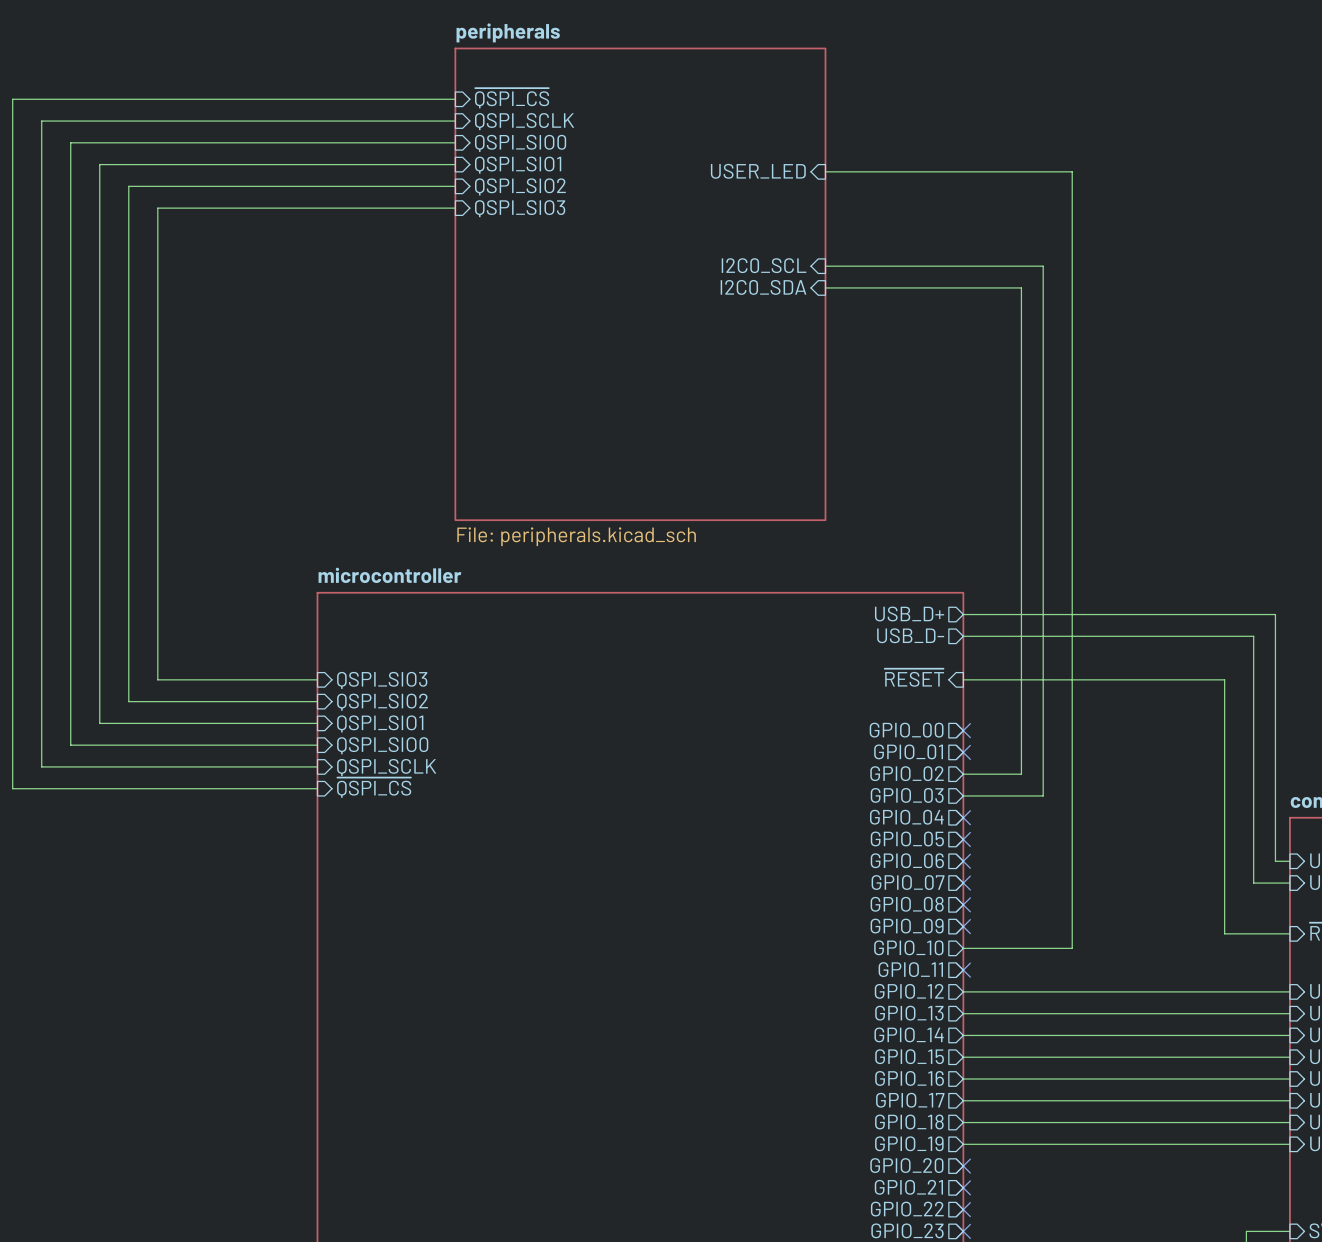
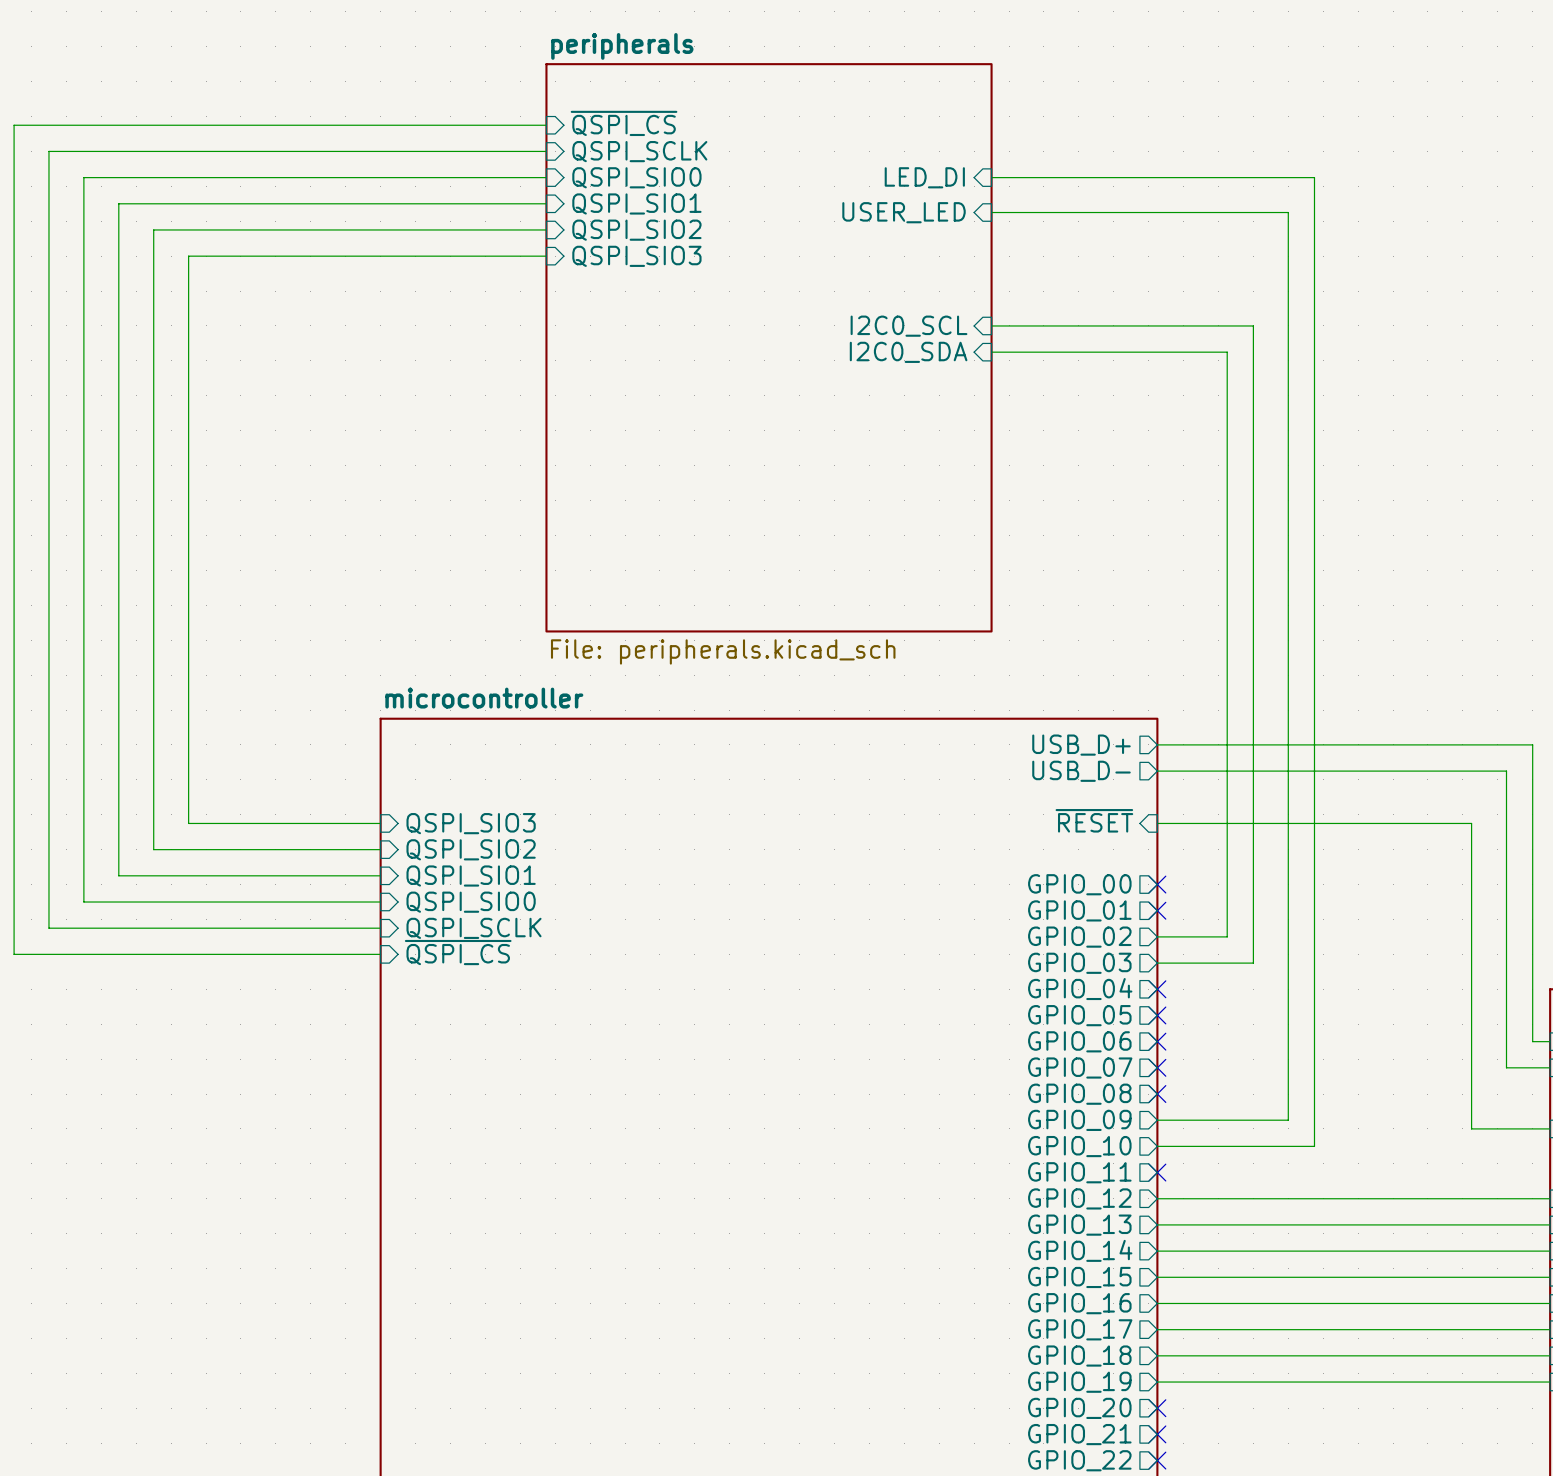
sheet pin: none -> LED_DI (924, 177)
wire: none -> (991, 177) (1314, 177) (1314, 1146) (1288, 1146)
no-connect mark: (963, 926) -> none
wire: (1072, 926) (1072, 948) -> (1288, 1120) (1157, 1120)

